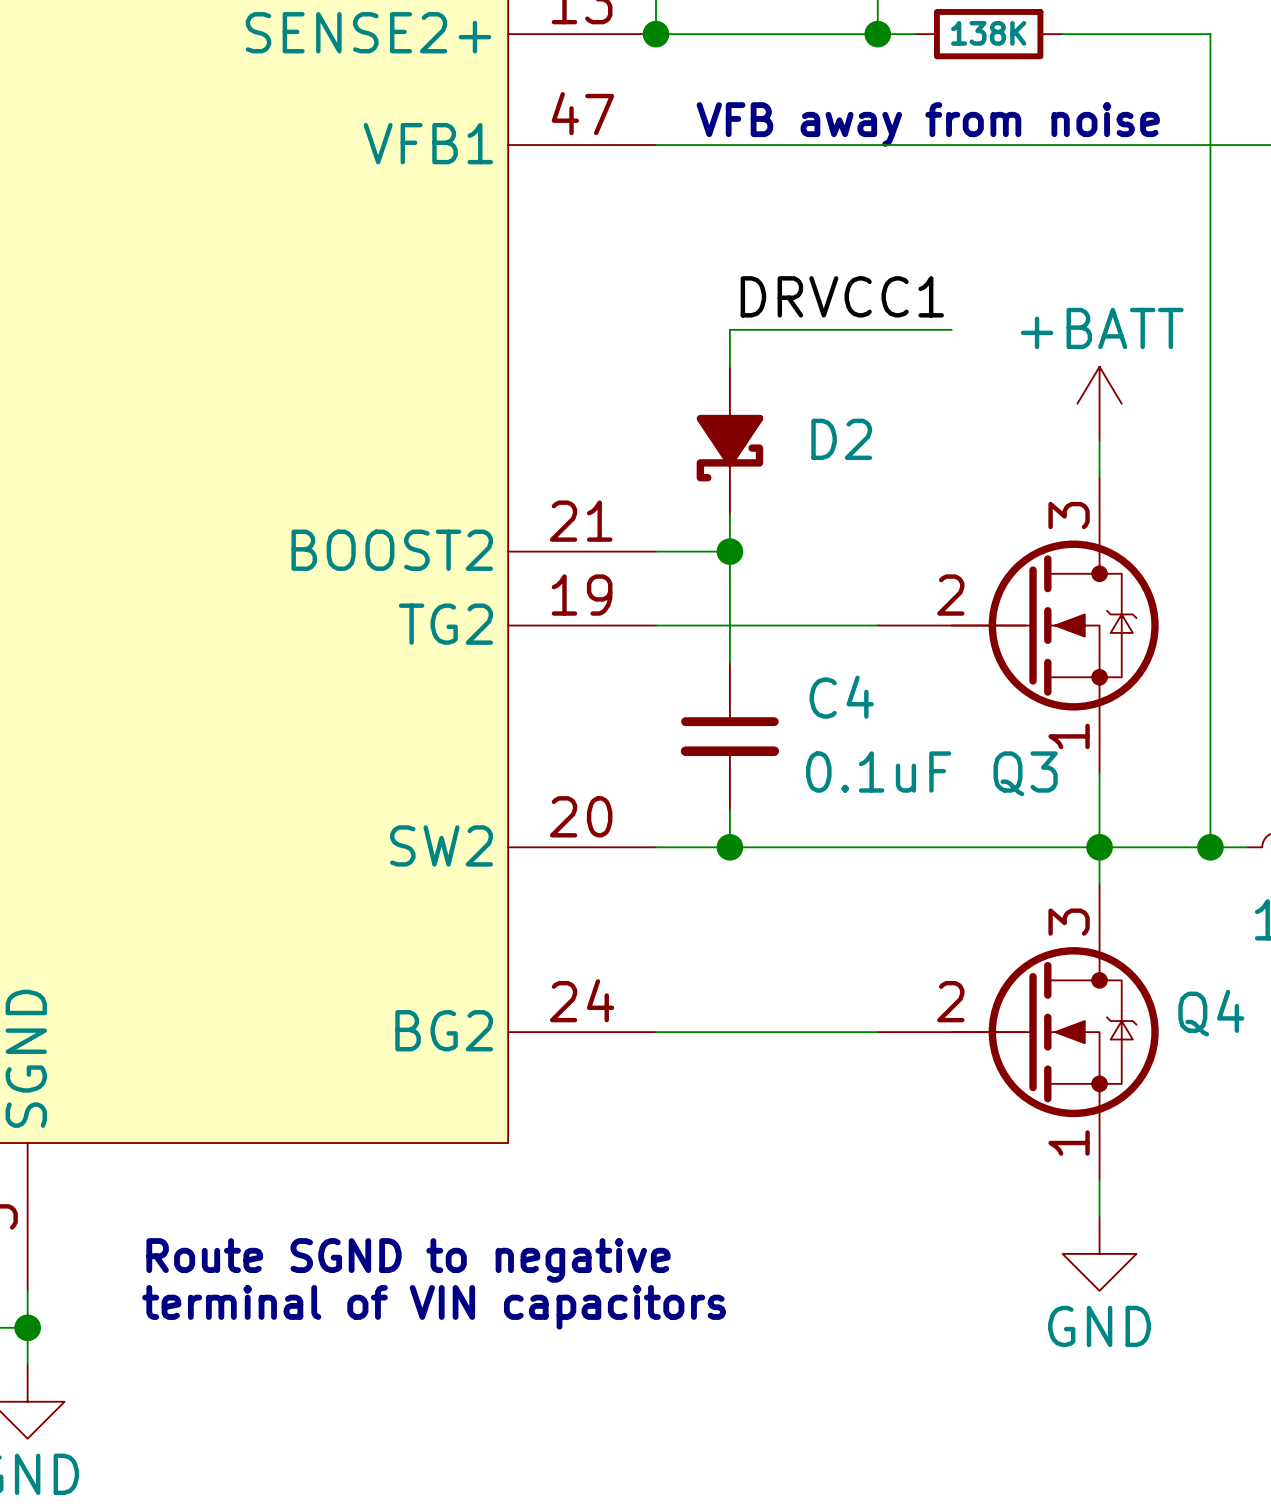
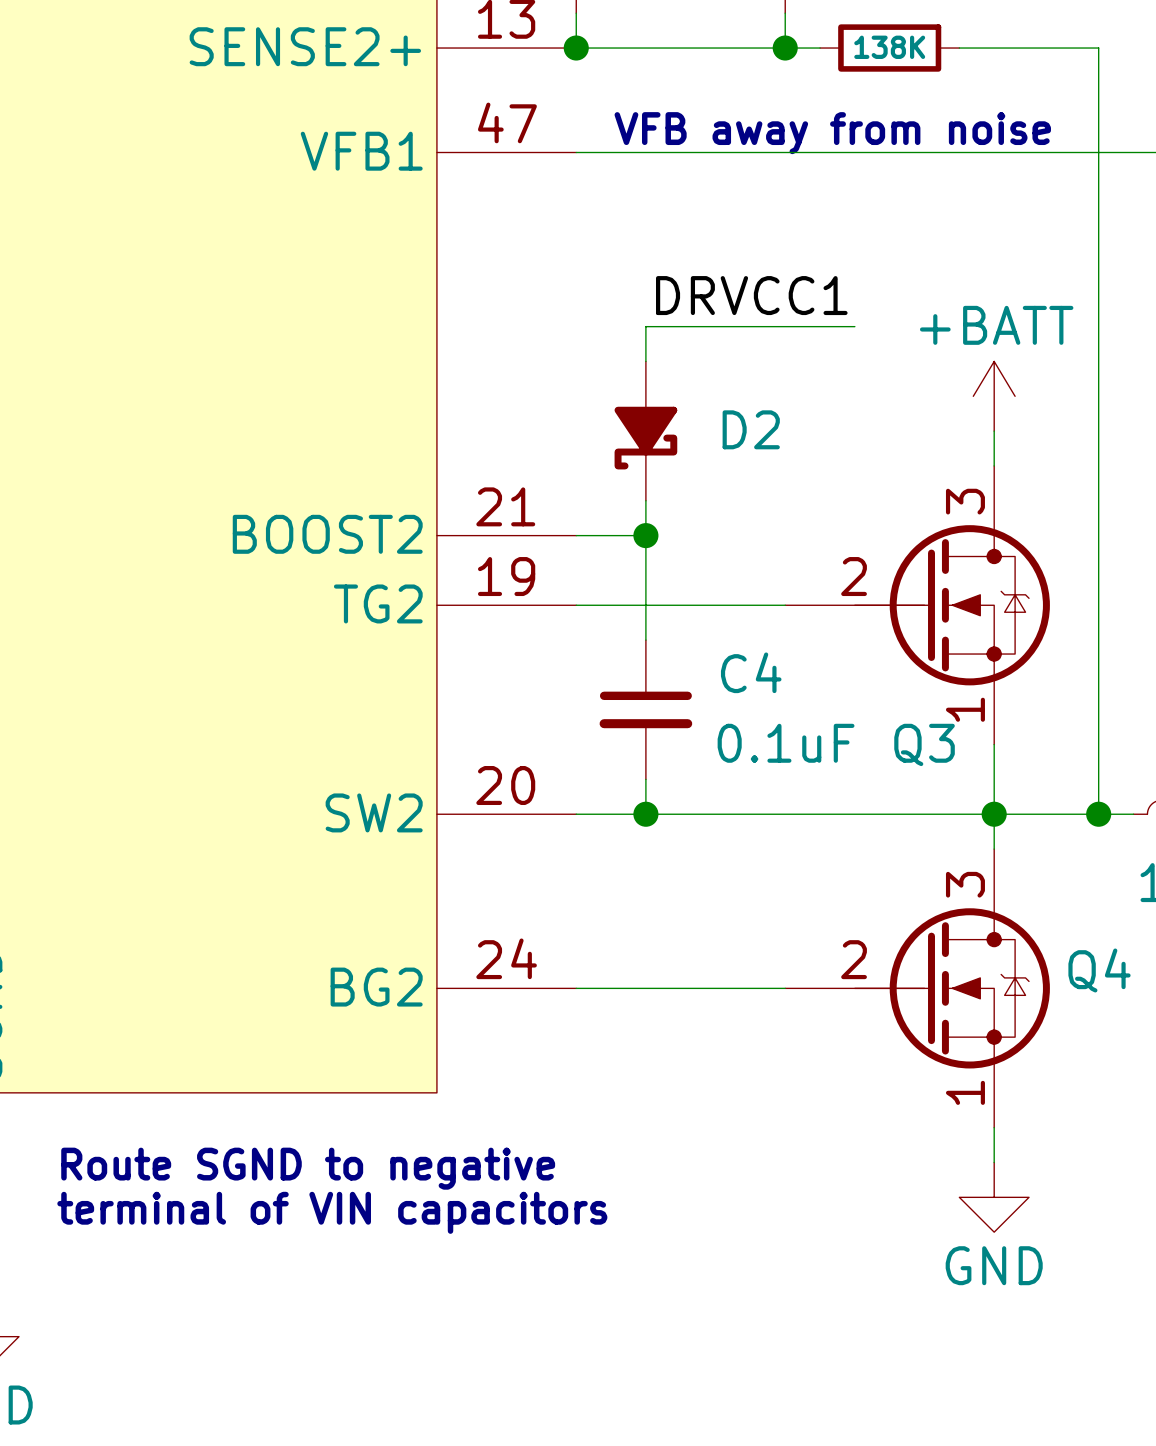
text position: Route SGND to negative (408, 1260) -> Route SGND to negative (308, 1168)
text position: terminal of VIN capacitors (434, 1307) -> terminal of VIN capacitors (332, 1212)

